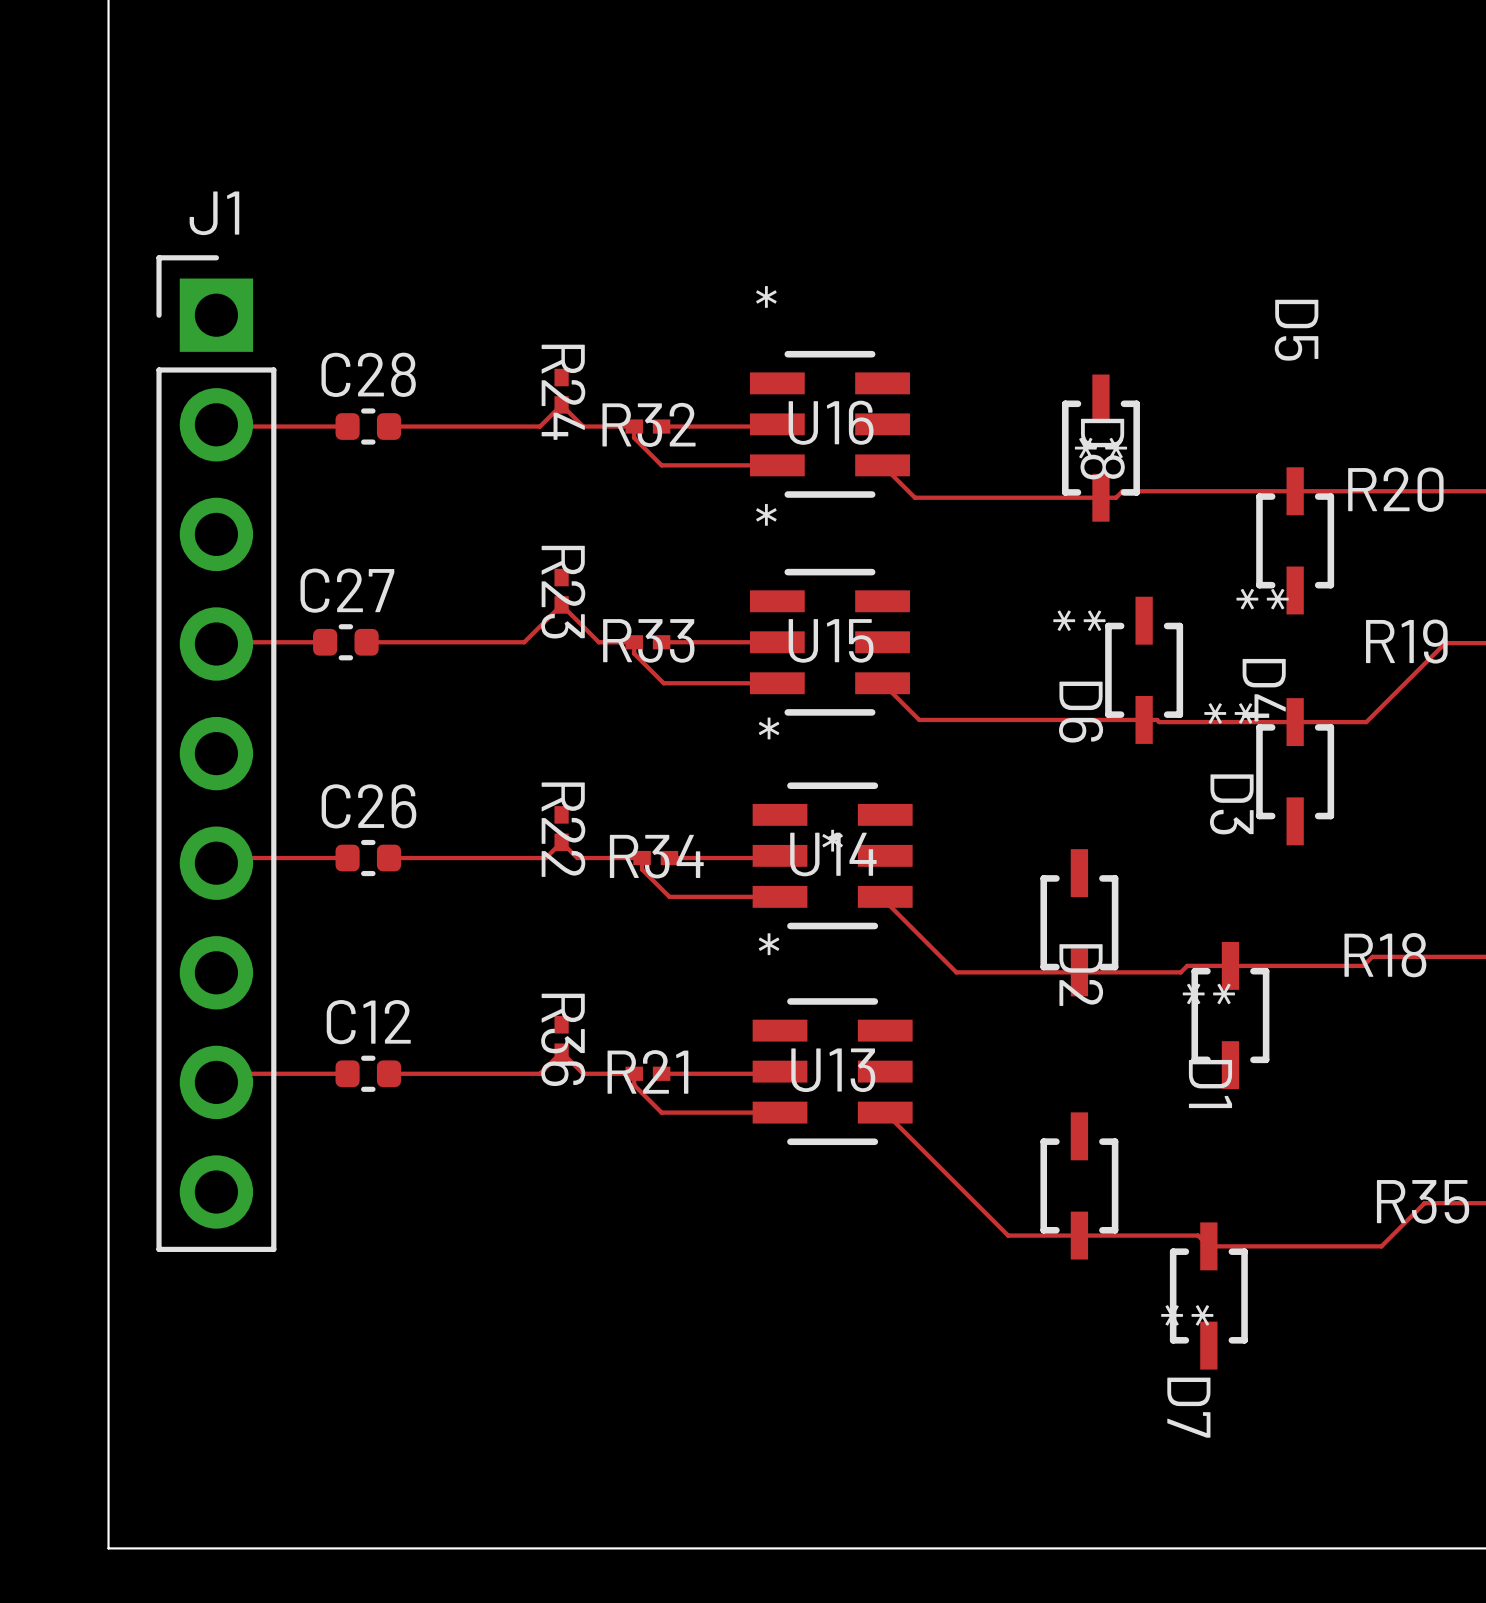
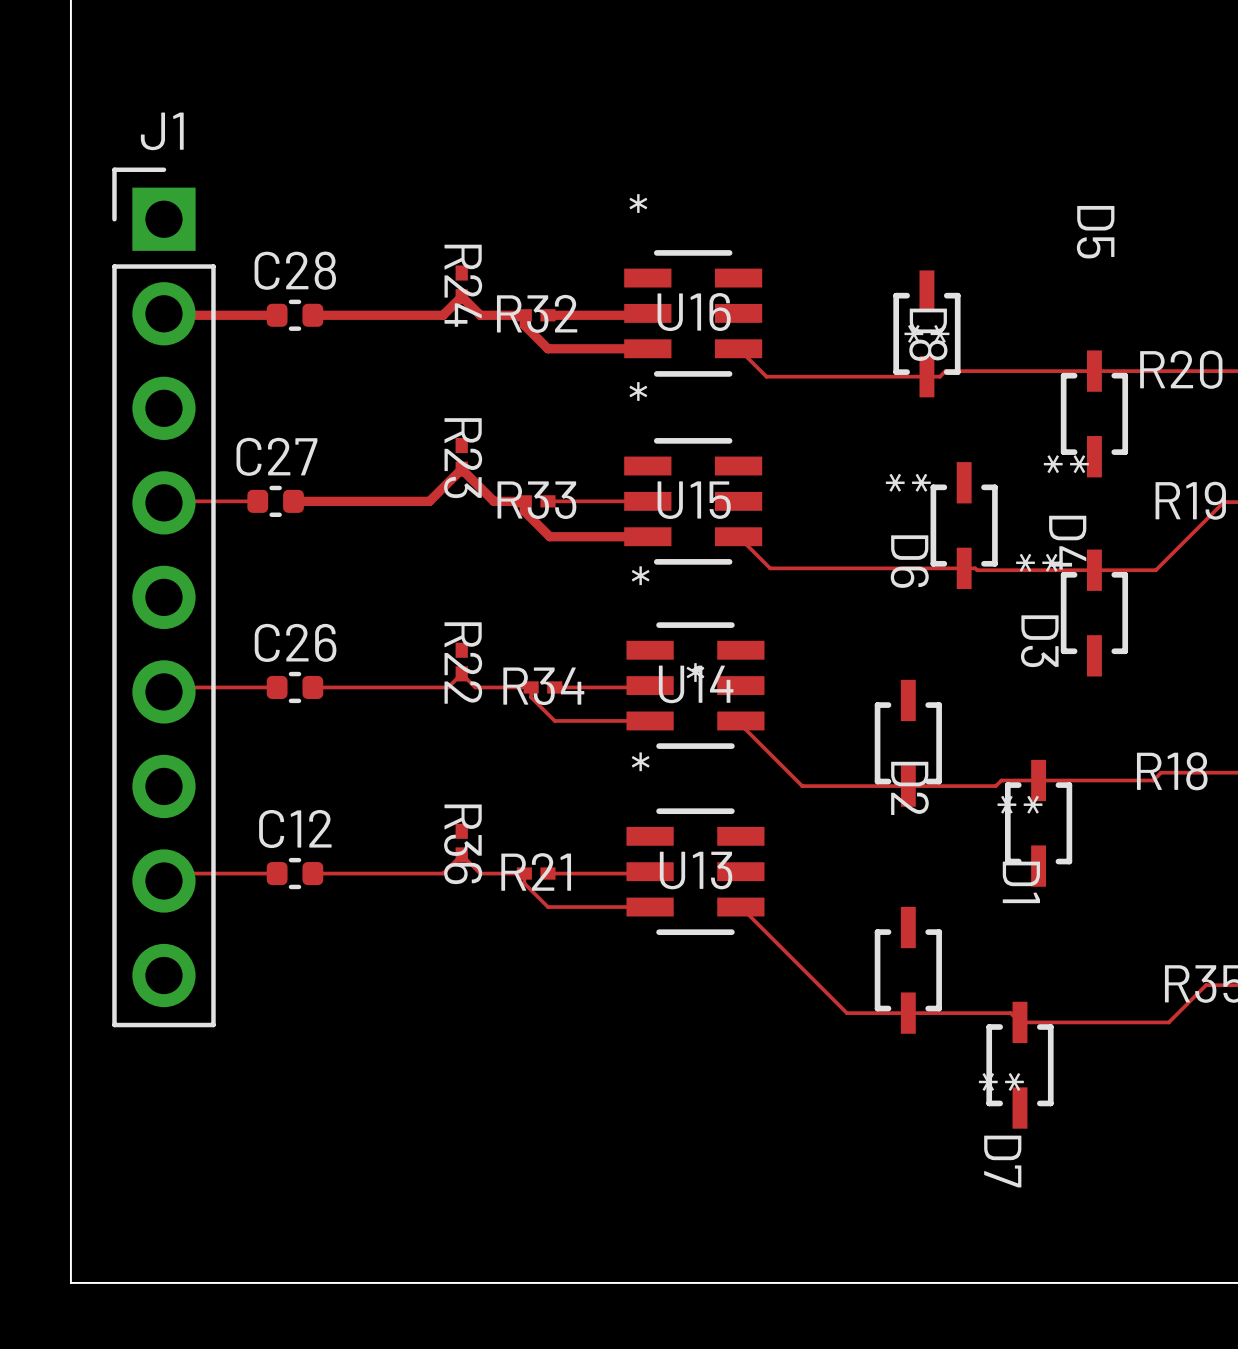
track width: thin (218, 426) (347, 426) -> thick (165, 315) (277, 315)
track width: thin (389, 426) (540, 426) (561, 404) (583, 426) (634, 426) (634, 437) (661, 465) (777, 465) -> thick (312, 315) (443, 315) (461, 296) (480, 315) (524, 315) (524, 325) (547, 348) (647, 348)
track width: thin (661, 426) (775, 426) -> thick (547, 315) (645, 315)
track width: thin (366, 642) (524, 642) (561, 604) (598, 642) (634, 642) (634, 653) (663, 683) (777, 683) -> thick (293, 501) (429, 501) (461, 469) (493, 501) (524, 501) (524, 511) (549, 536) (647, 536)

